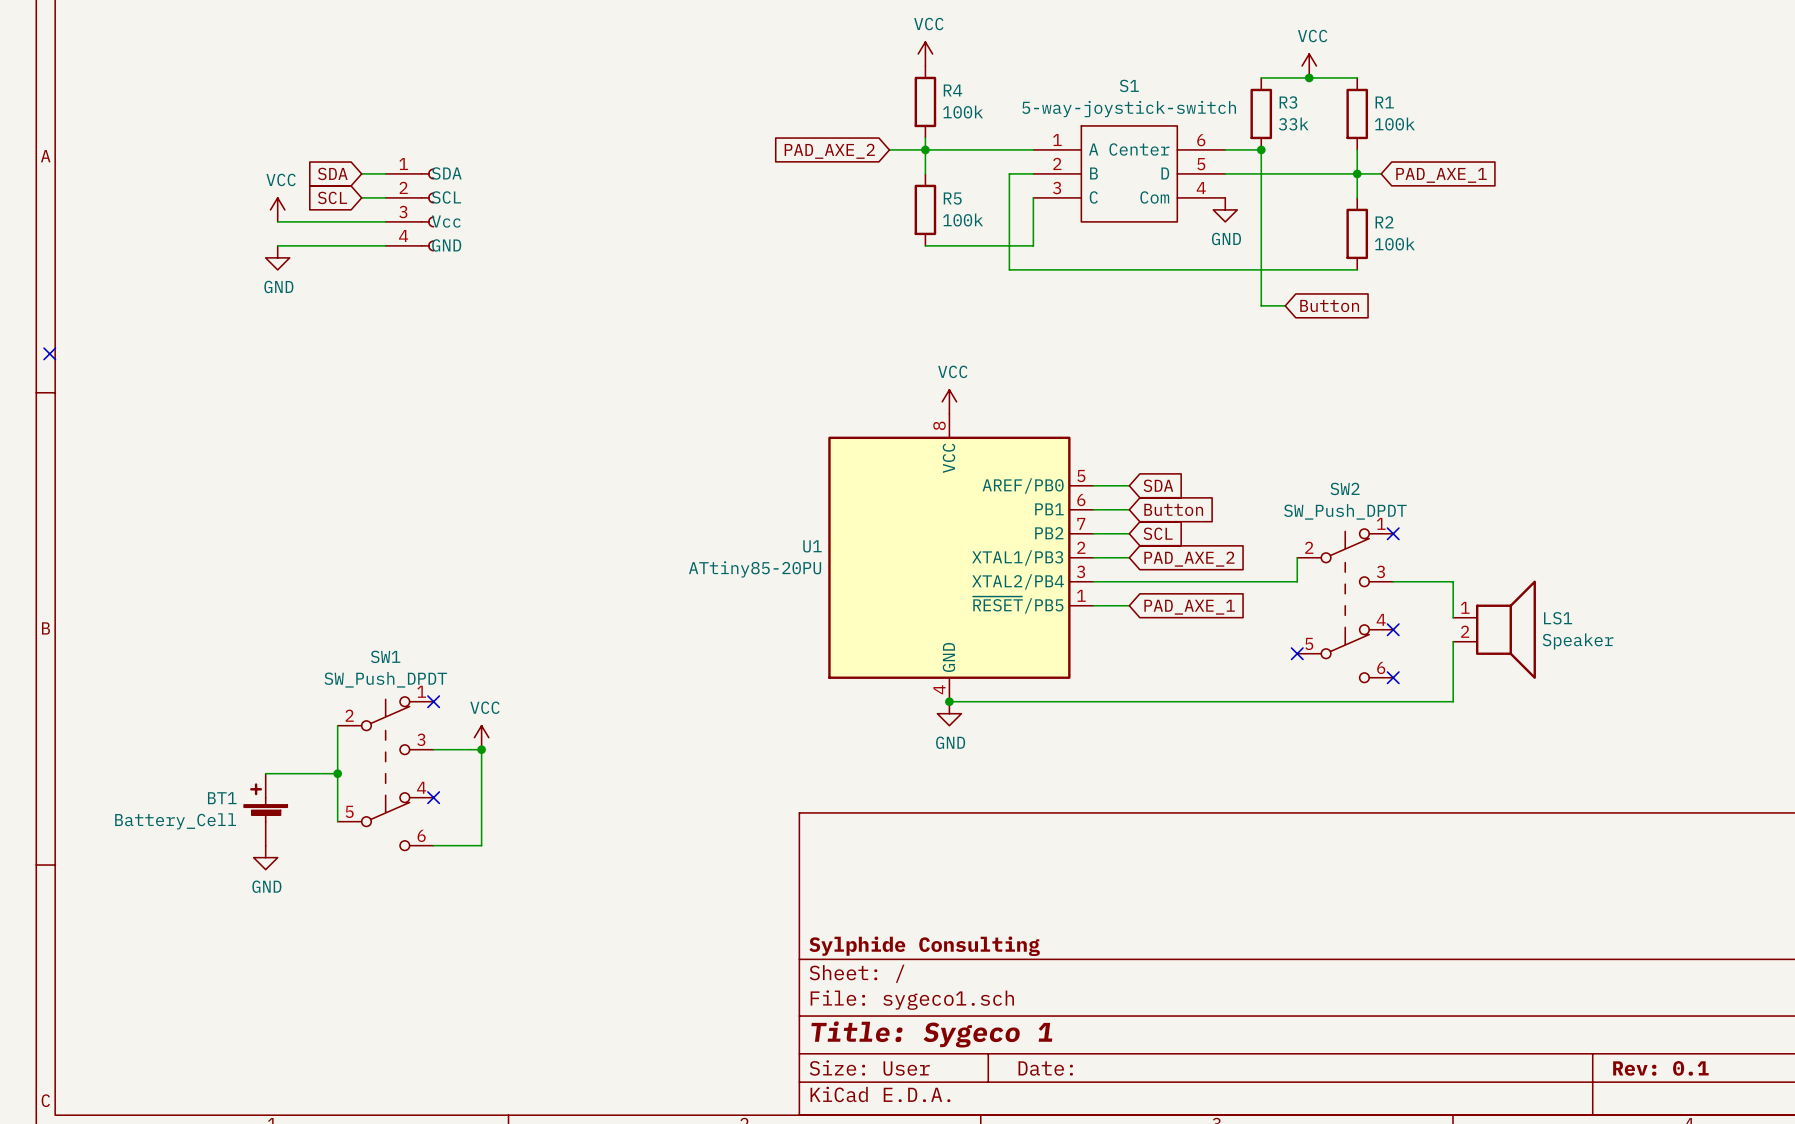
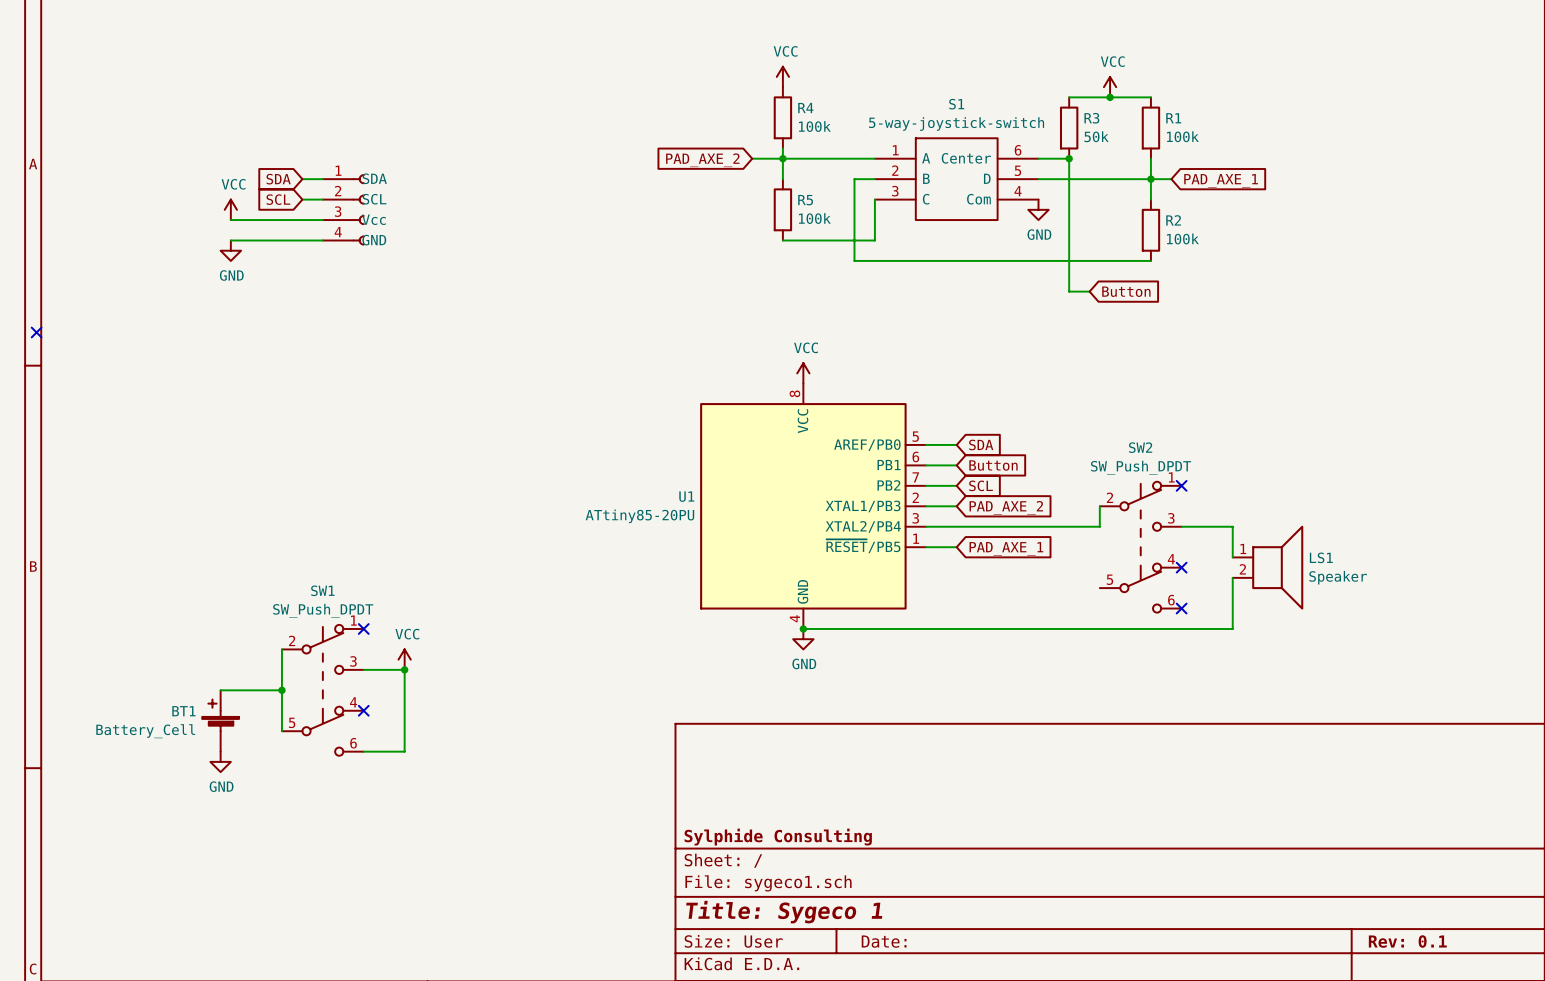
R3 value: 33k (1293, 124) -> 50k (1096, 136)
no-connect mark: (1297, 653) -> none

